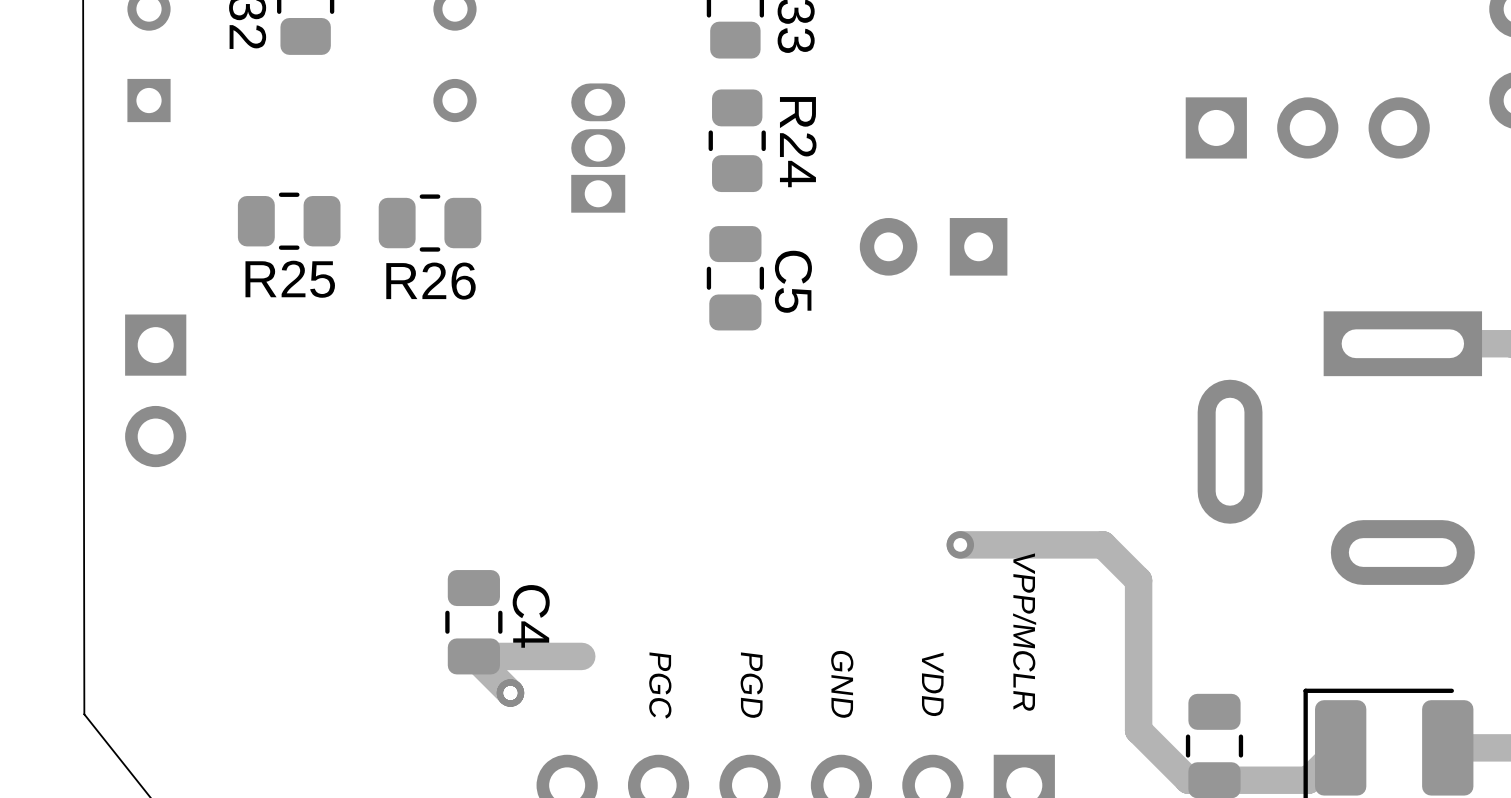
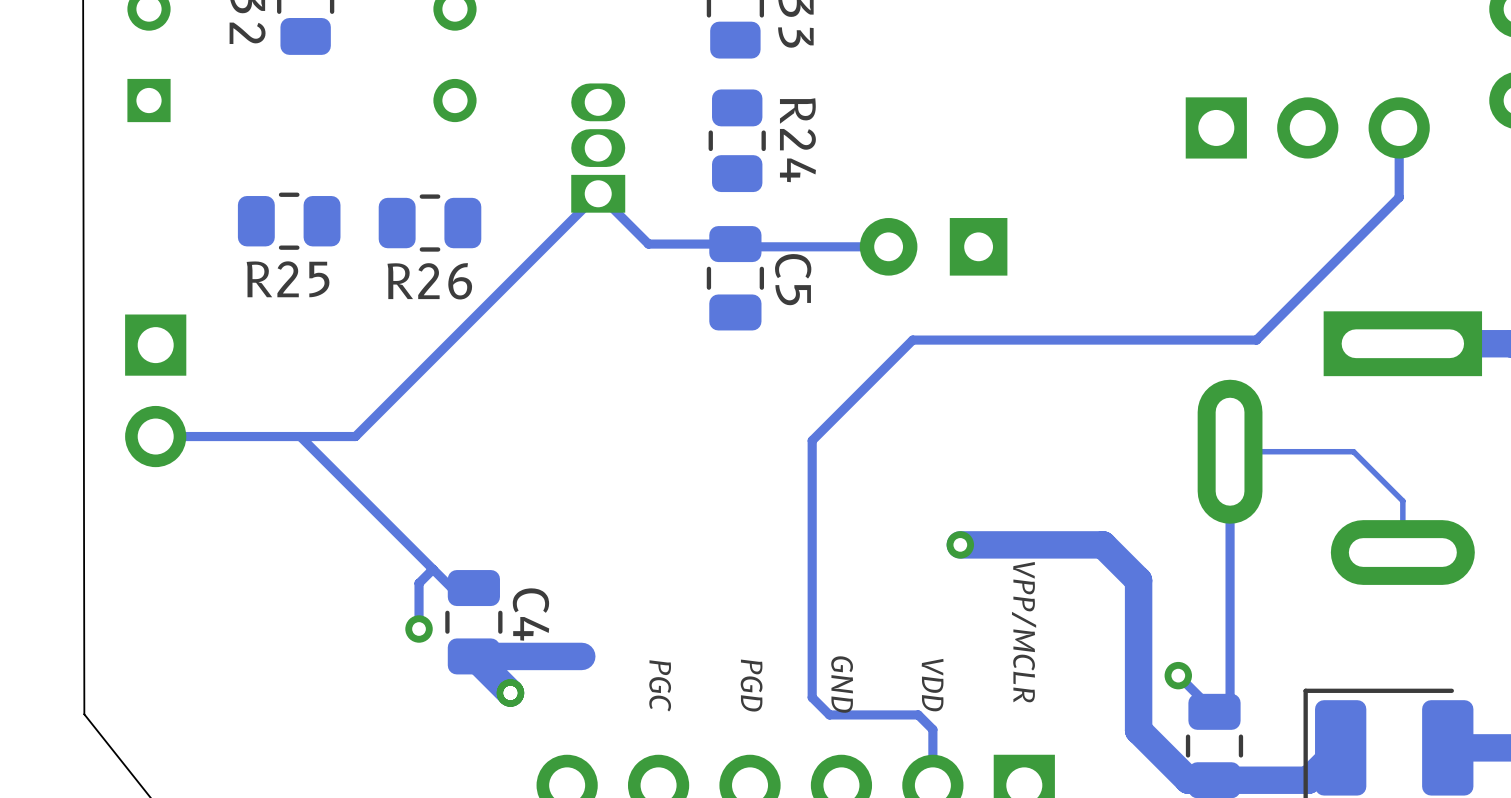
track: none -> (1399, 127) (1399, 197) (1256, 340) (912, 340) (812, 440) (812, 697) (829, 714) (918, 714) (932, 729) (932, 785)
track: none -> (888, 246) (738, 246) (735, 244) (648, 244) (598, 193) (355, 436) (155, 436)
track: none -> (300, 436) (451, 588) (473, 588)
track: none -> (1402, 552) (1402, 501) (1353, 451) (1230, 451) (1230, 696) (1214, 711) (1178, 675)
track: none -> (433, 569) (419, 583) (419, 629)
via: none -> (419, 629)
via: none -> (1178, 675)

